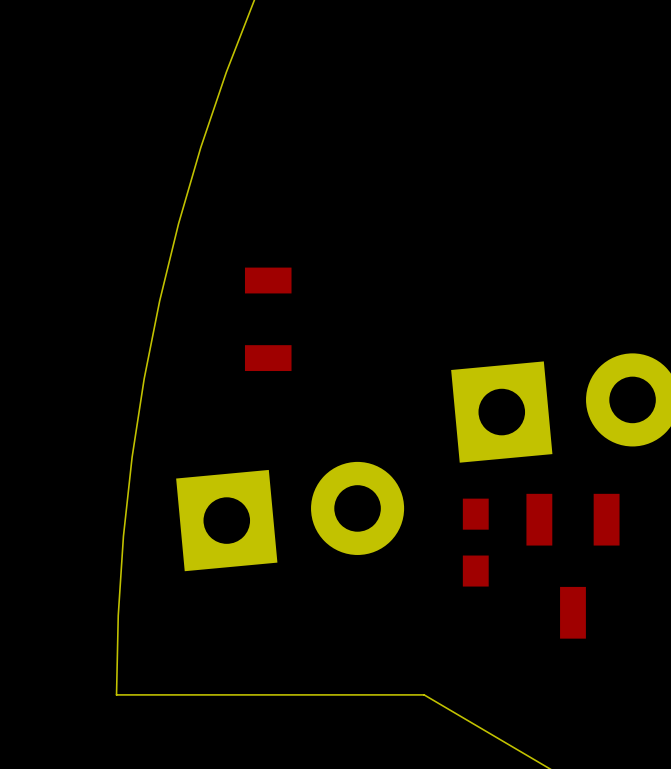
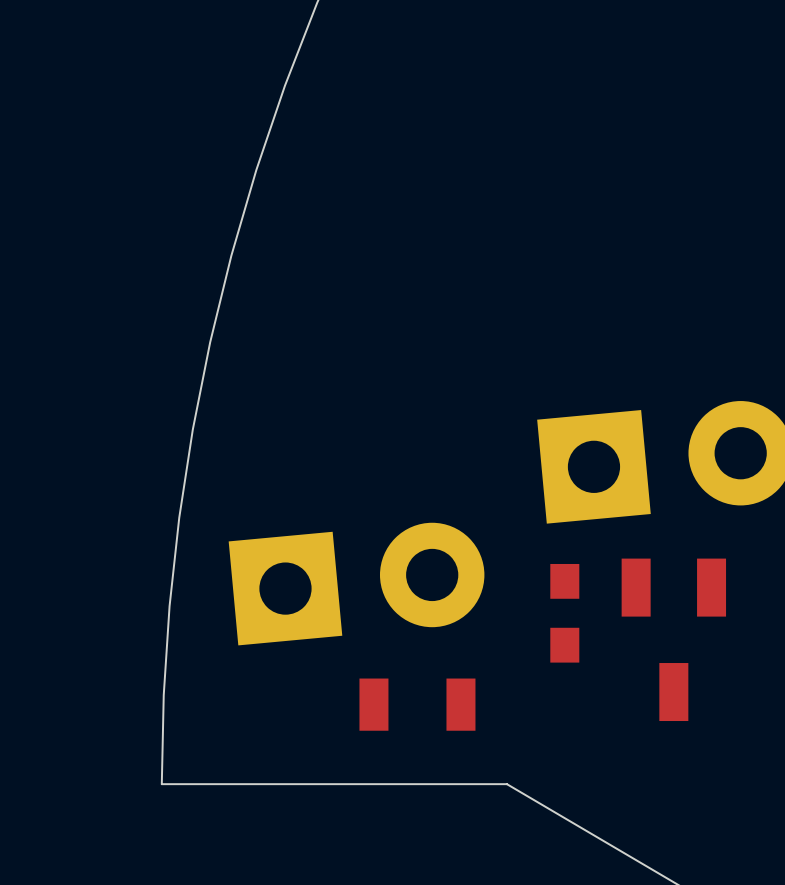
part rotation: 0° (268, 319) -> 90° clockwise (417, 704)
part position: (268, 319) -> (417, 704)

